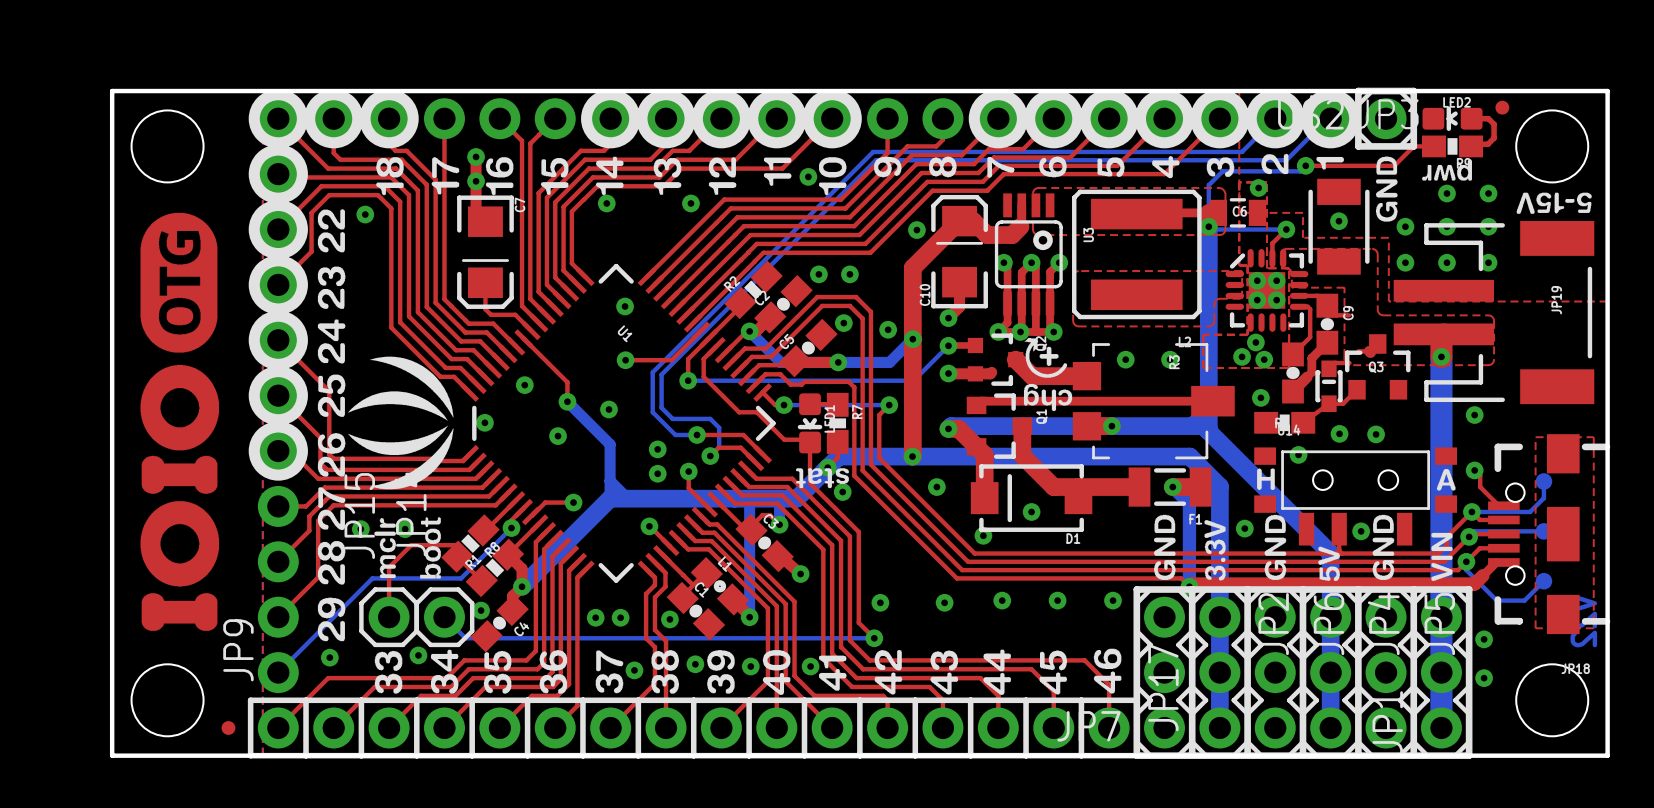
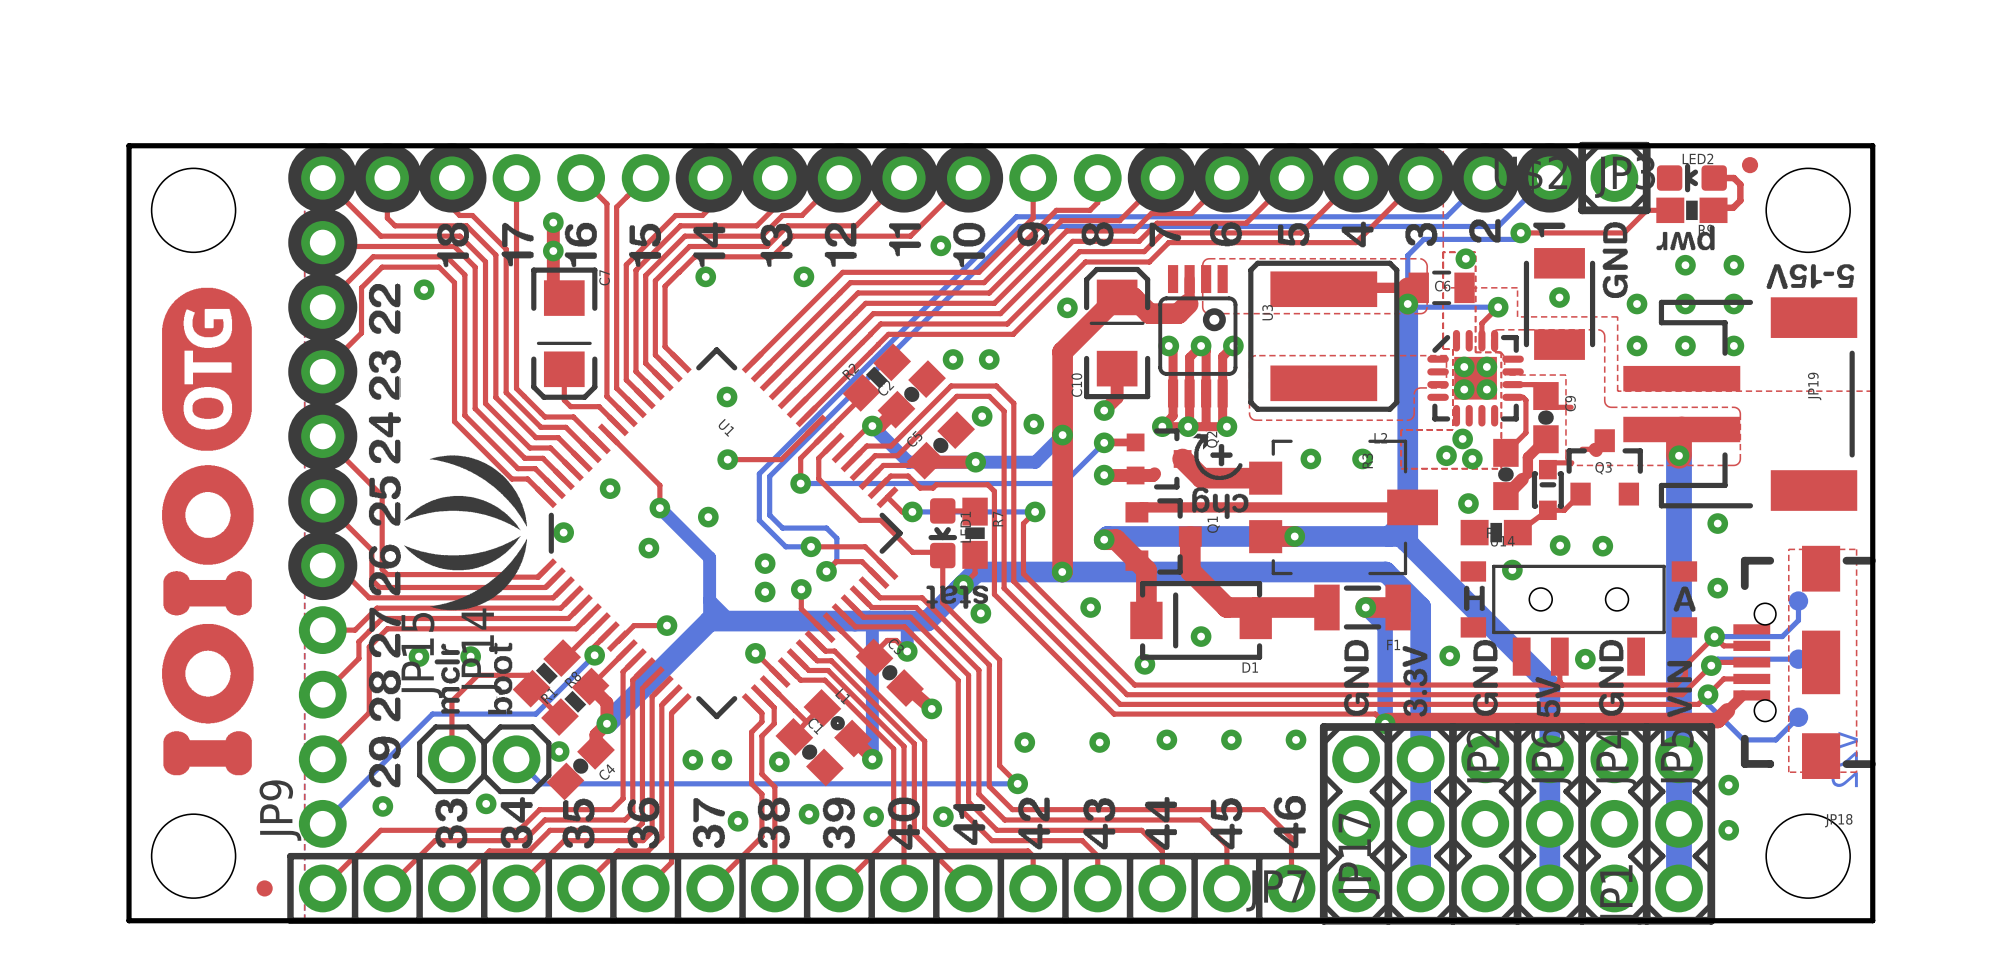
top track: (1474, 470) (1480, 475) (1480, 487) (1498, 505) (1503, 505) -> none

